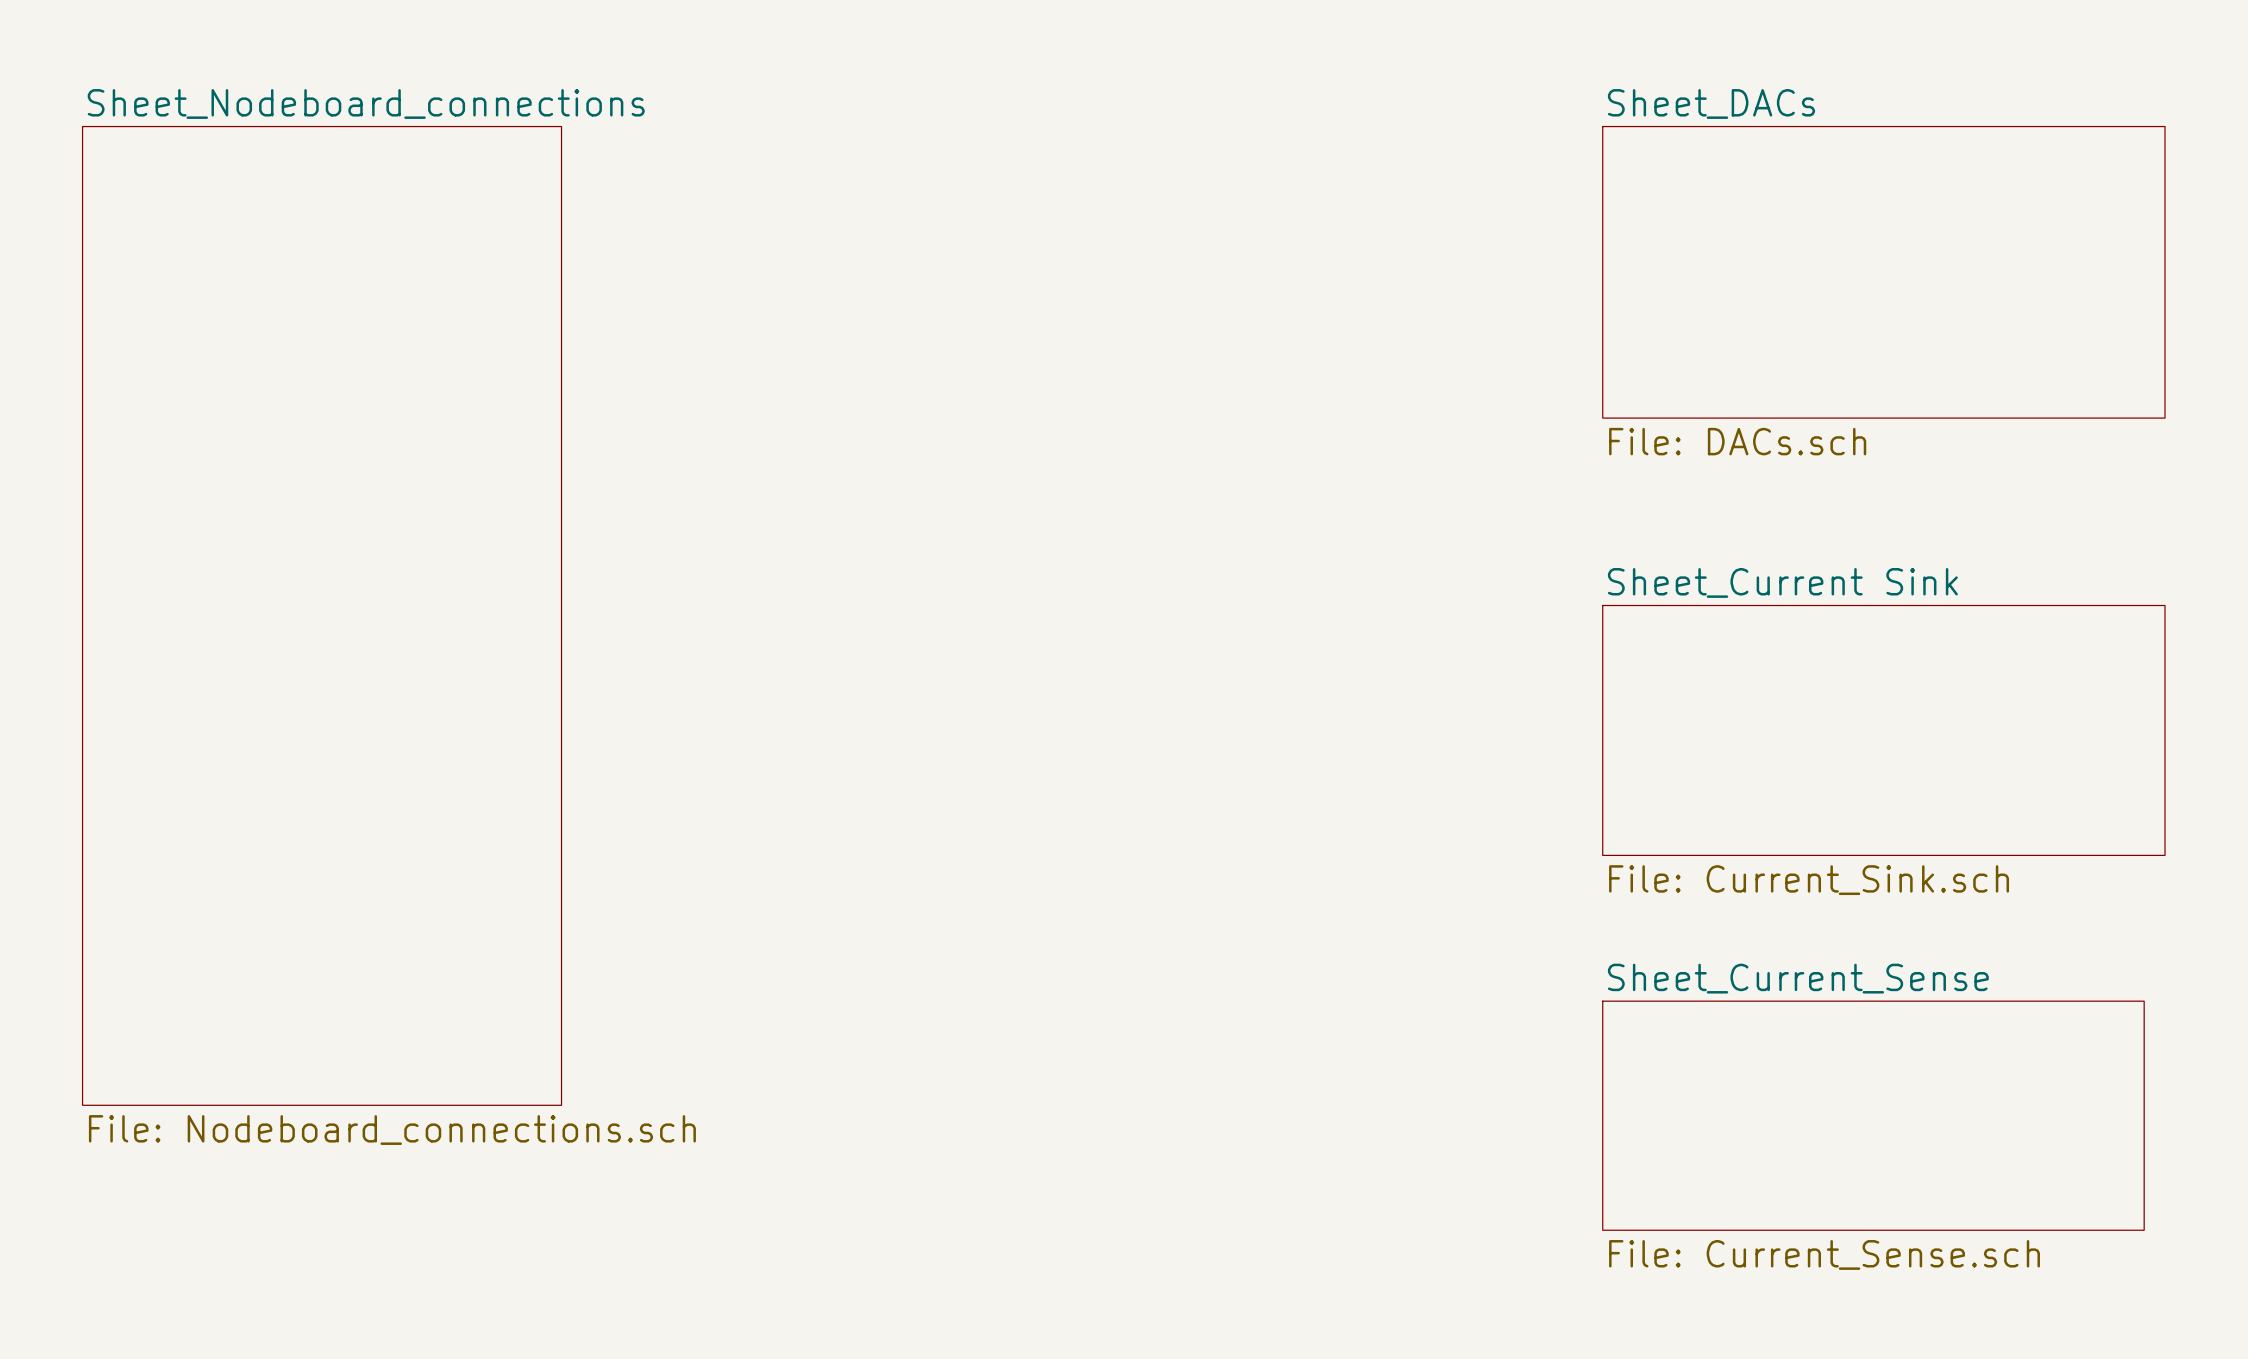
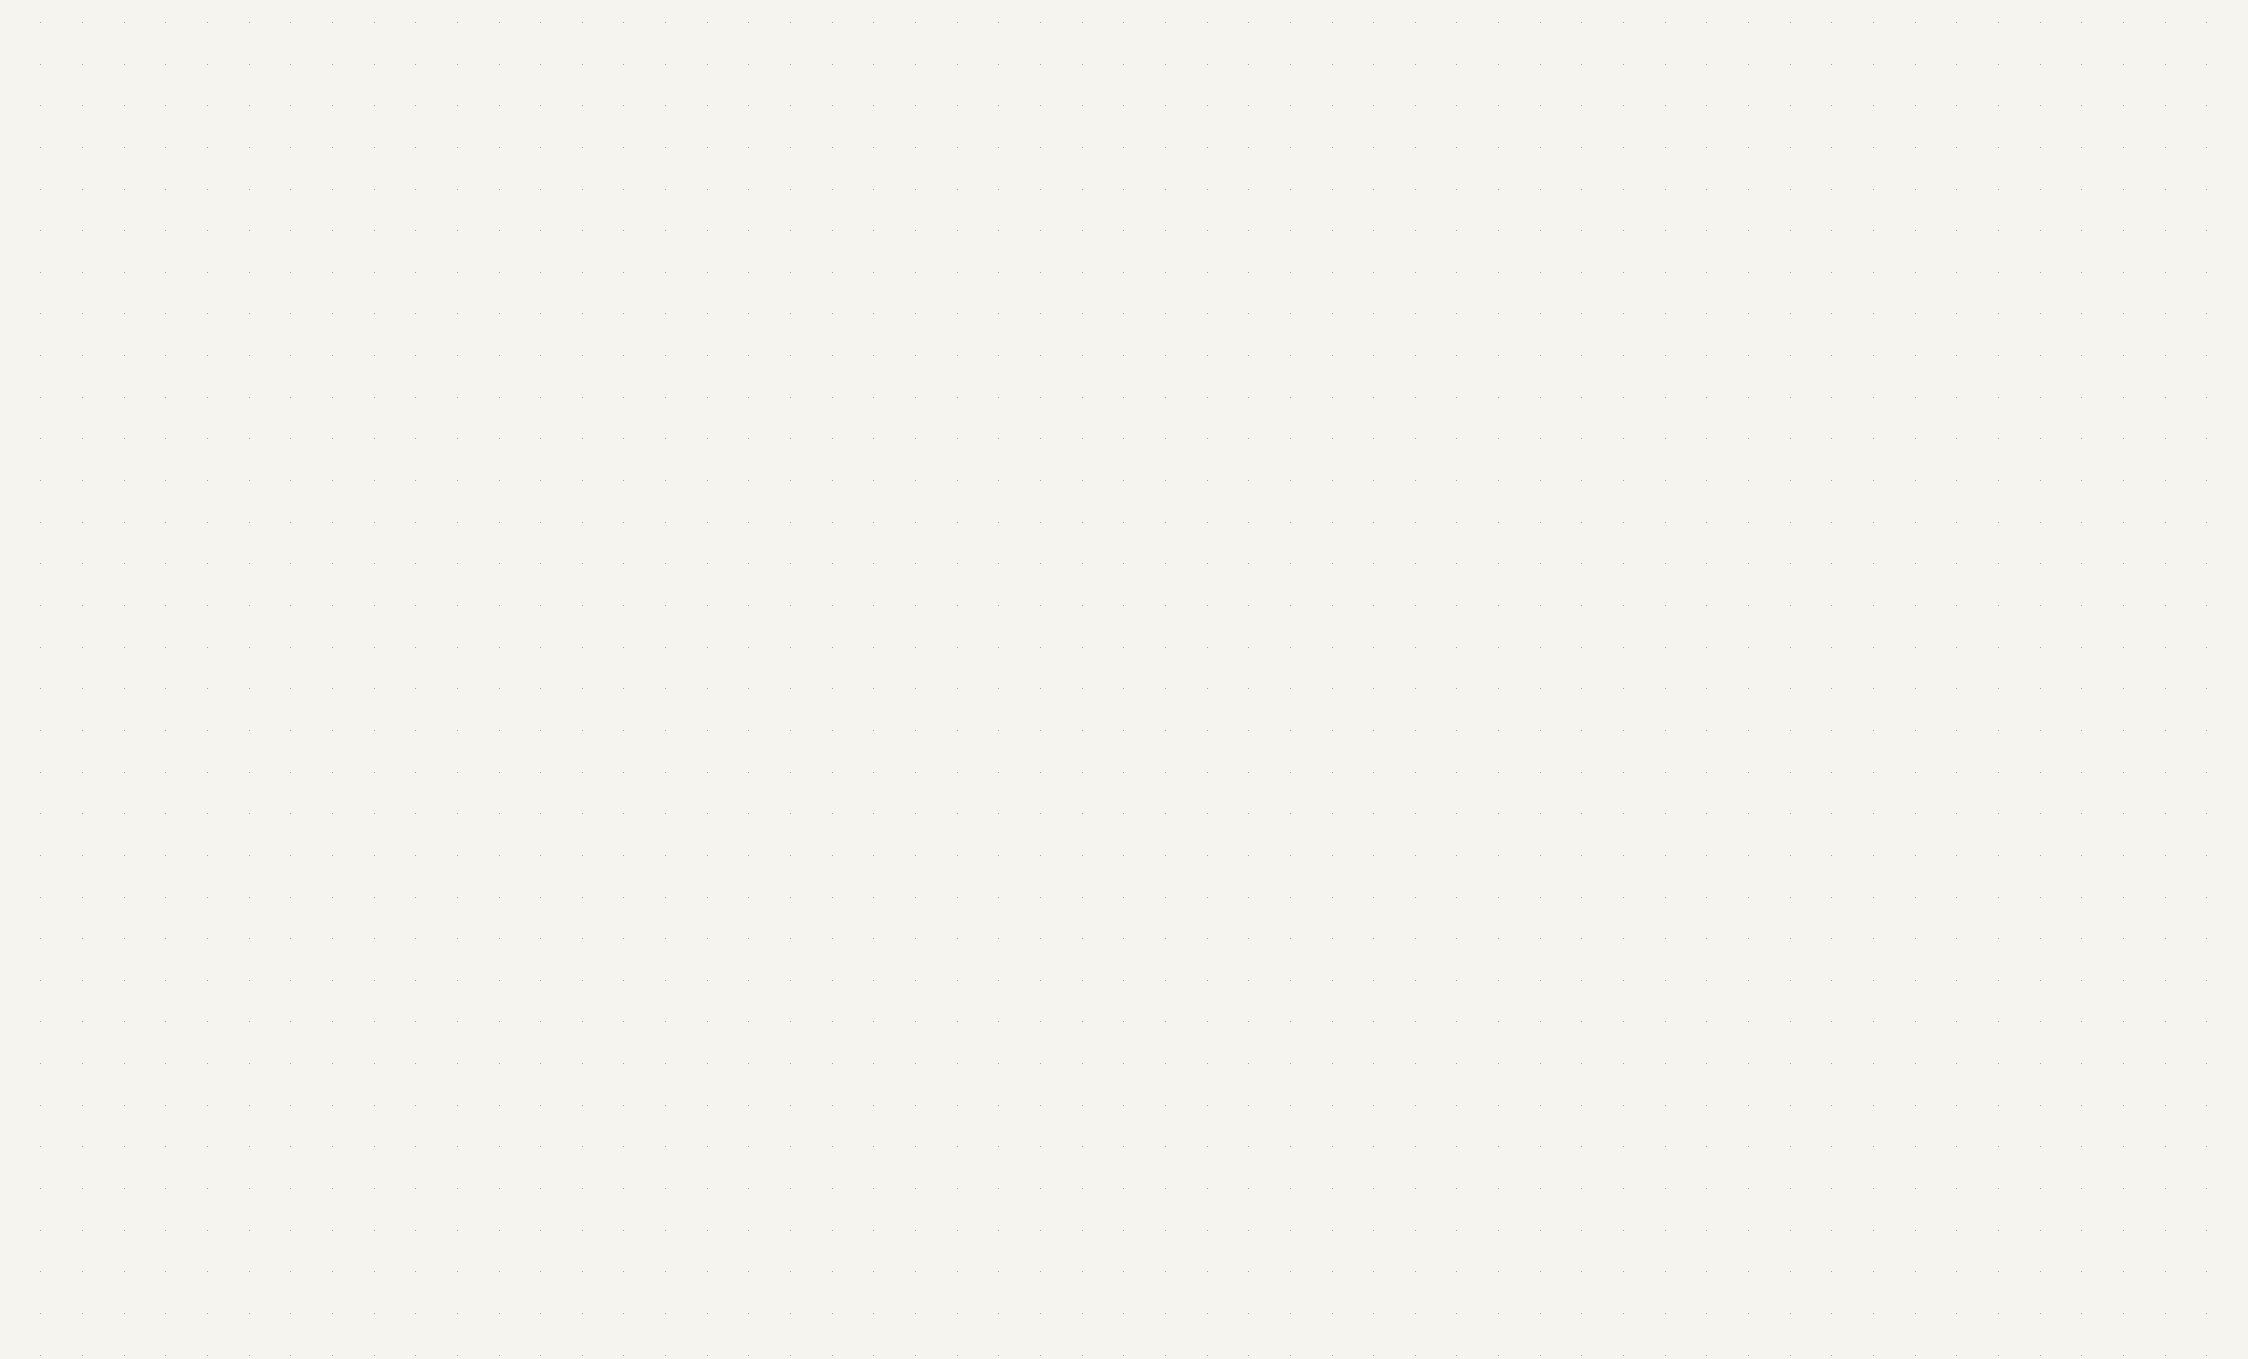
sheet Sheet_DACs: File: DACs.sch (1883, 272) -> none
sheet Sheet_Nodeboard_connections: File: Nodeboard_connections.sch (322, 615) -> none
sheet Sheet_Current Sink: File: Current_Sink.sch (1883, 730) -> none
sheet Sheet_Current_Sense: File: Current_Sense.sch (1873, 1115) -> none

